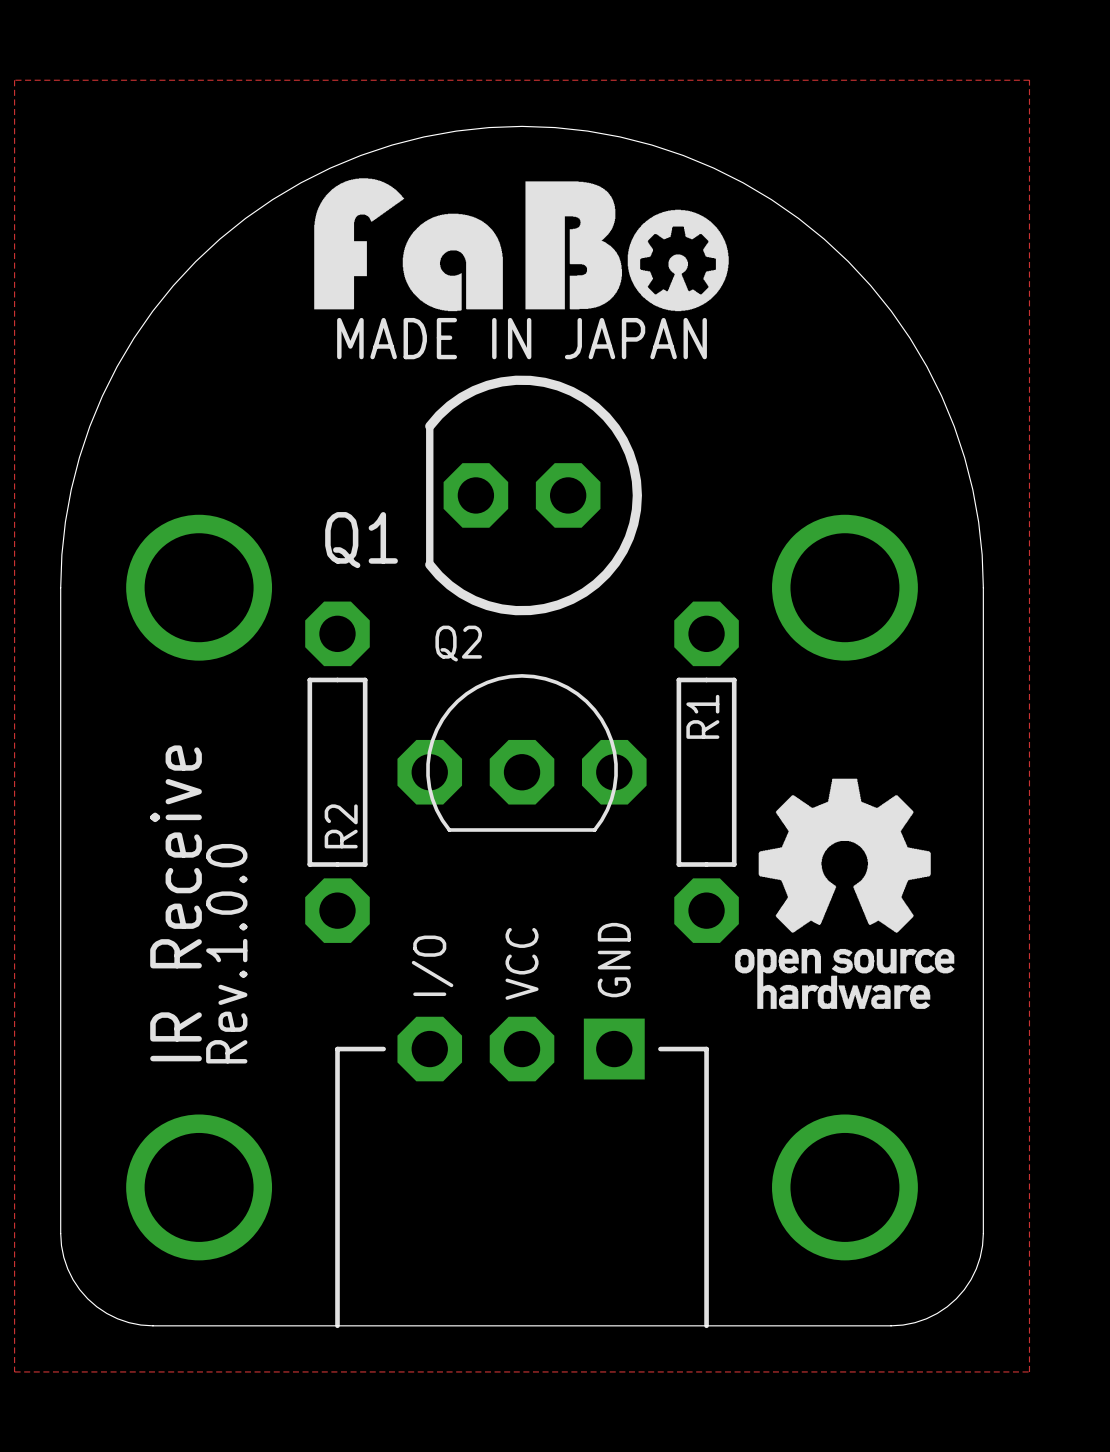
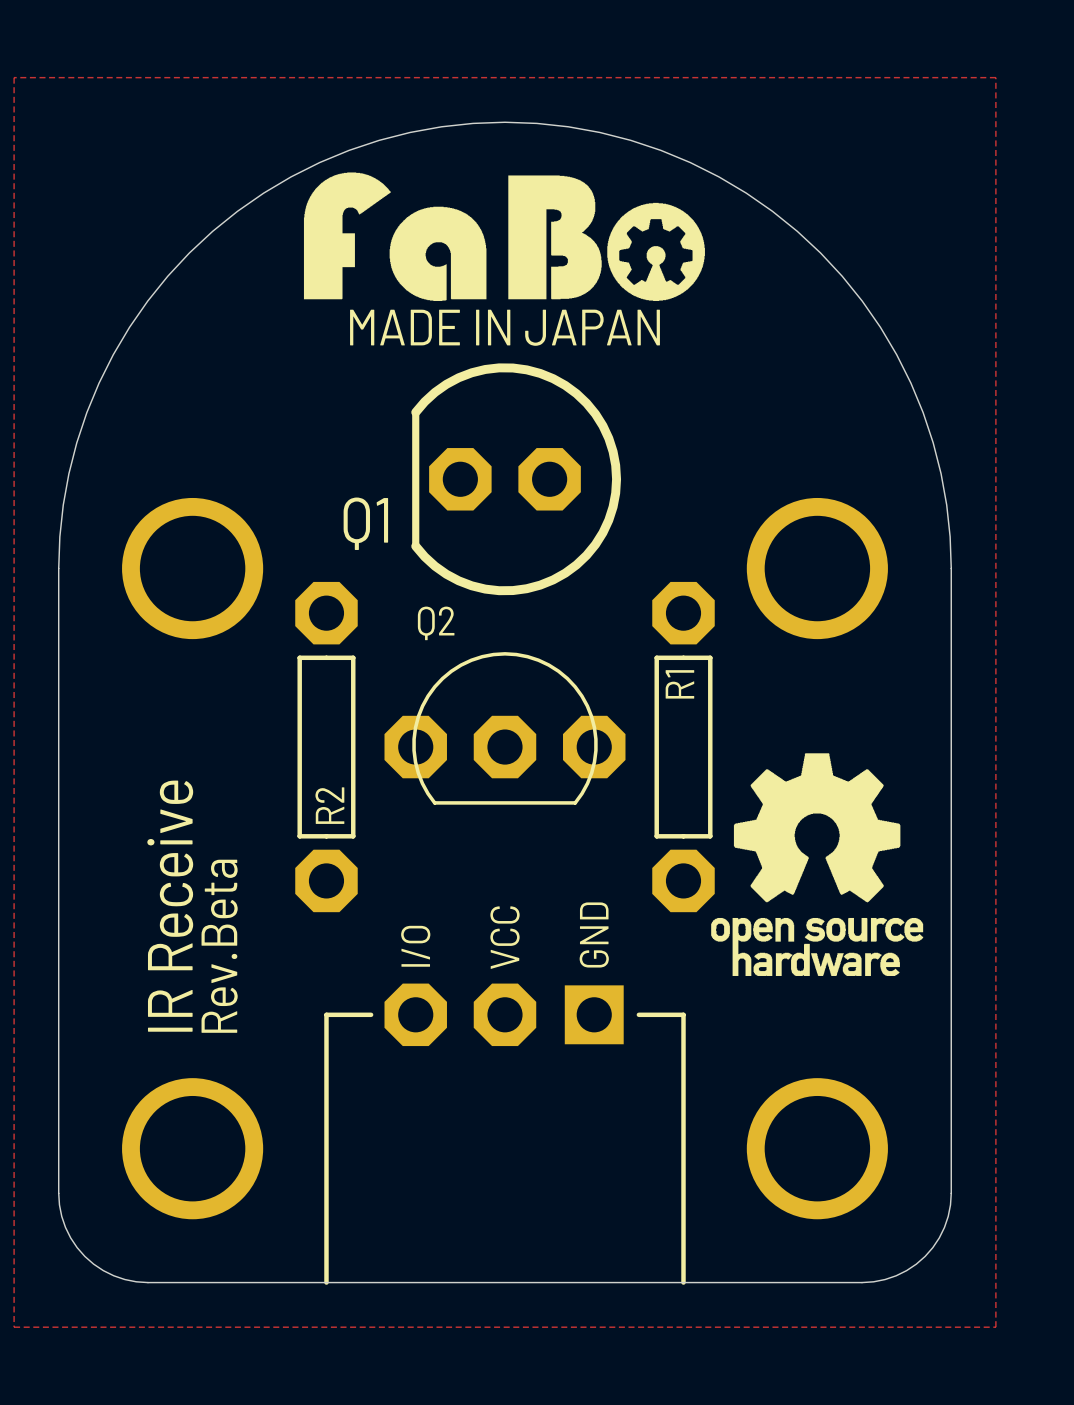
text: Rev.1.0.0 (226, 953) -> Rev.Beta (219, 946)

